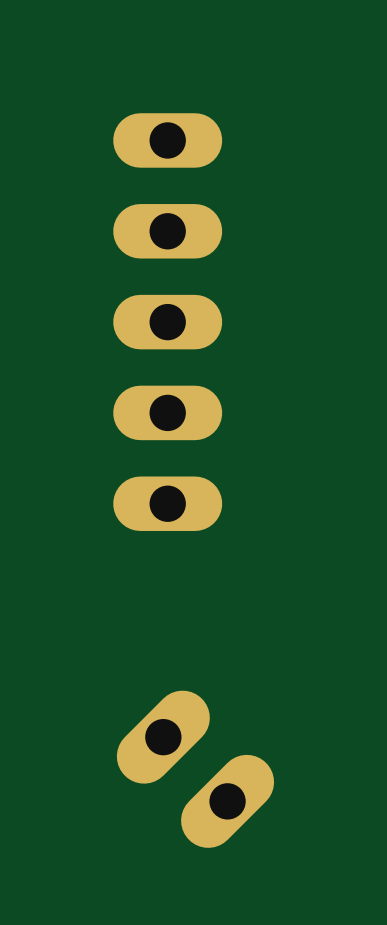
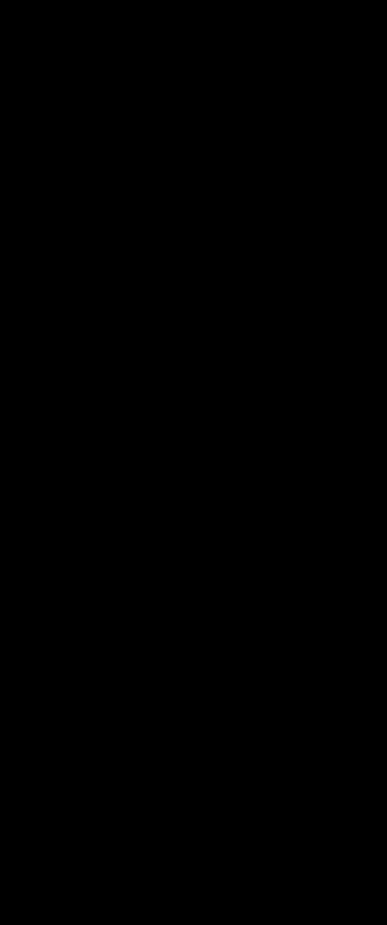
part: (167, 322) -> none
part: (195, 769) -> none

